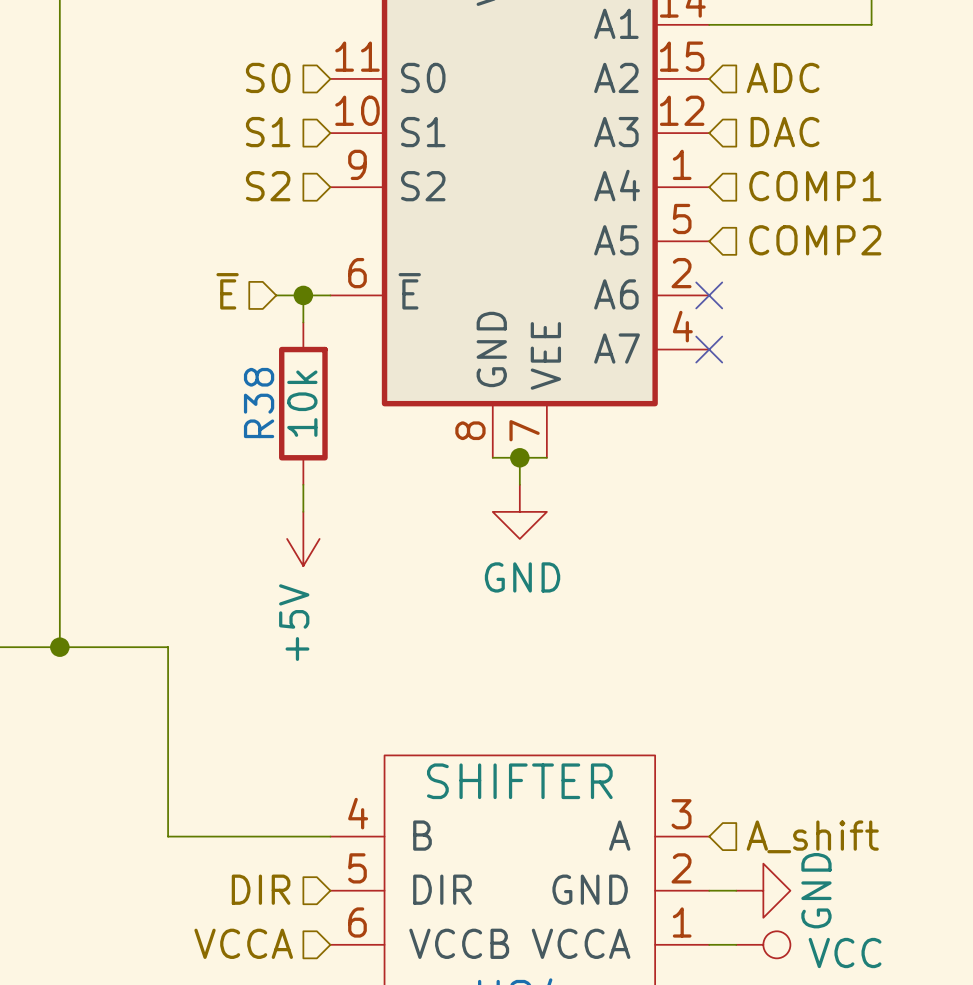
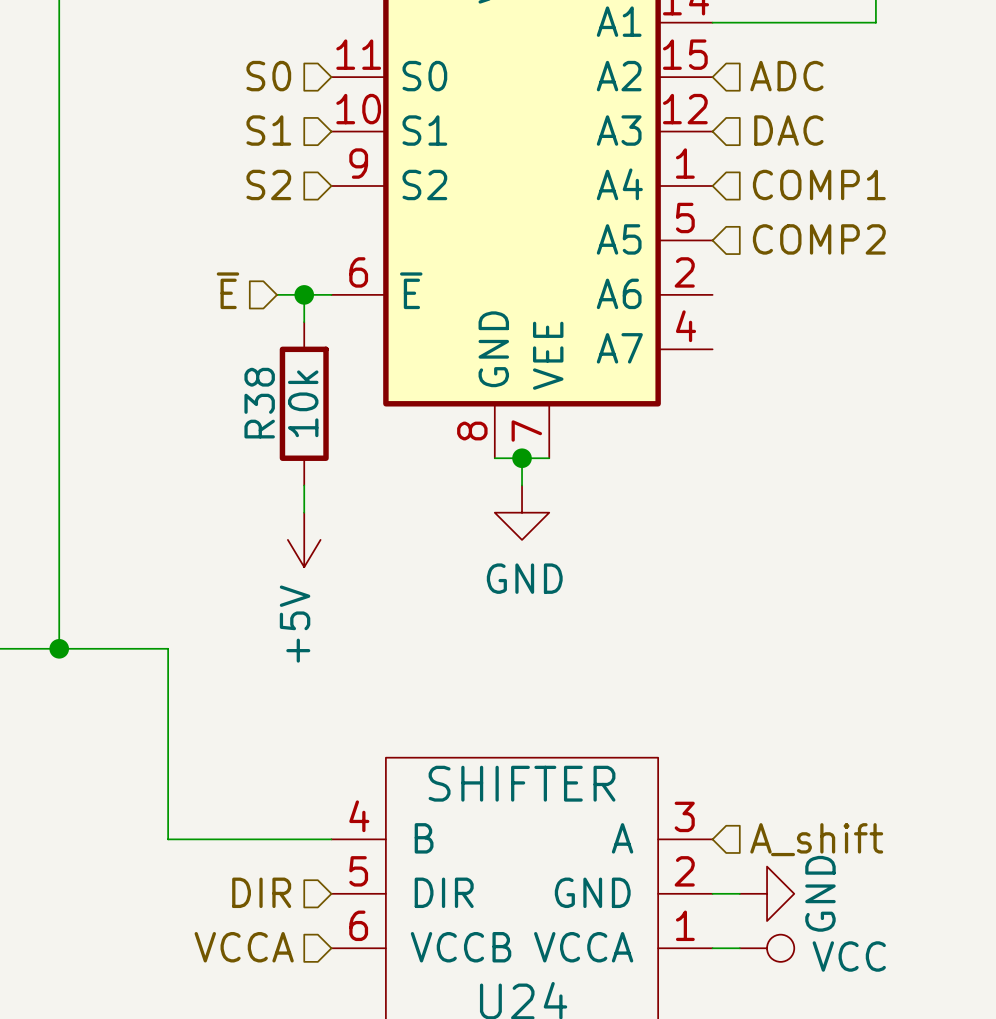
no-connect mark: (709, 295) -> none
no-connect mark: (709, 349) -> none

